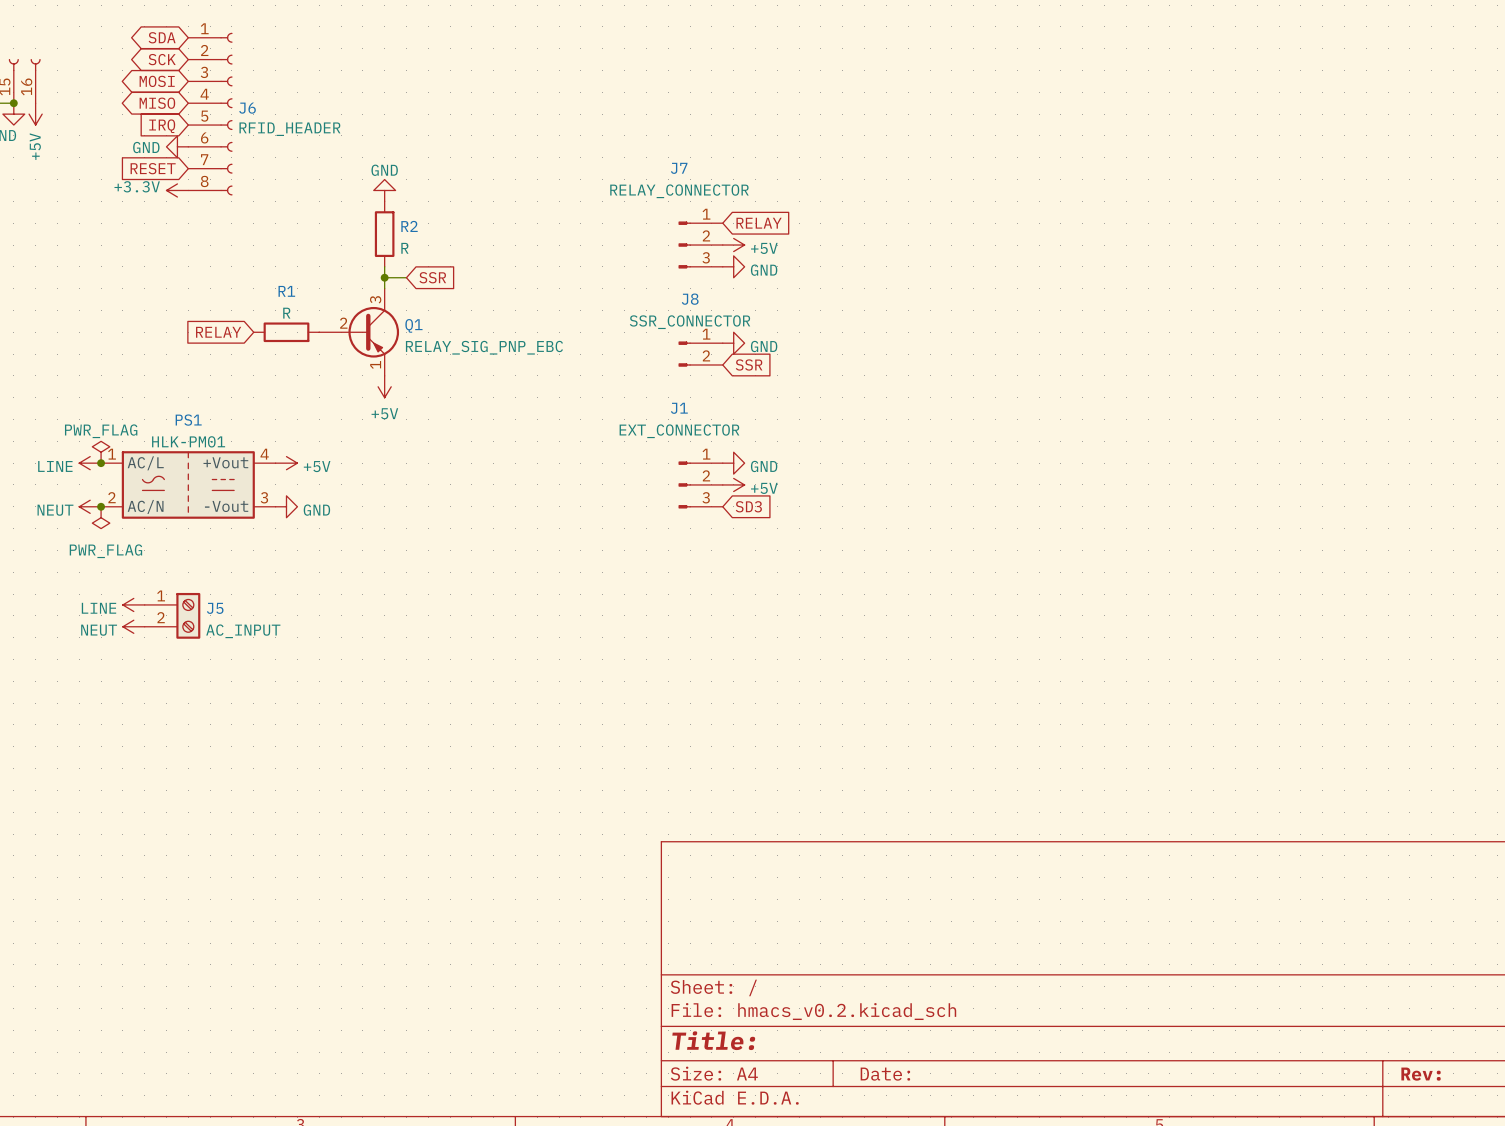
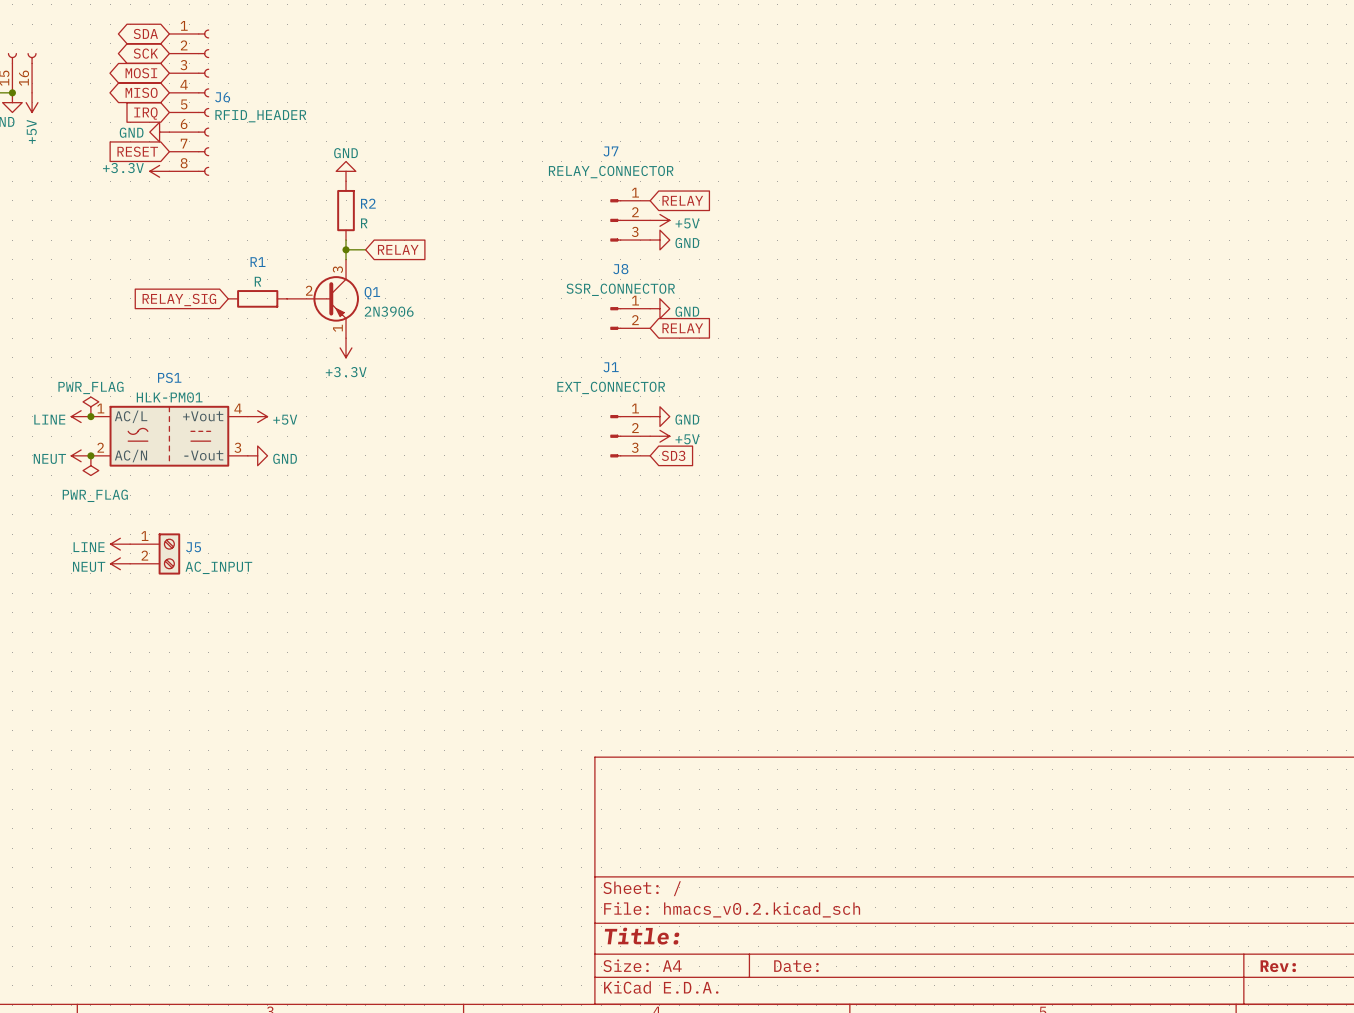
global label: SSR (432, 277) -> RELAY (398, 249)
global label: RELAY (218, 332) -> RELAY_SIG (179, 299)
Q1 value: RELAY_SIG_PNP_EBC (484, 347) -> 2N3906 (389, 311)
global label: SSR (749, 364) -> RELAY (682, 328)
power symbol: +5V (384, 386) -> +3.3V (346, 347)

